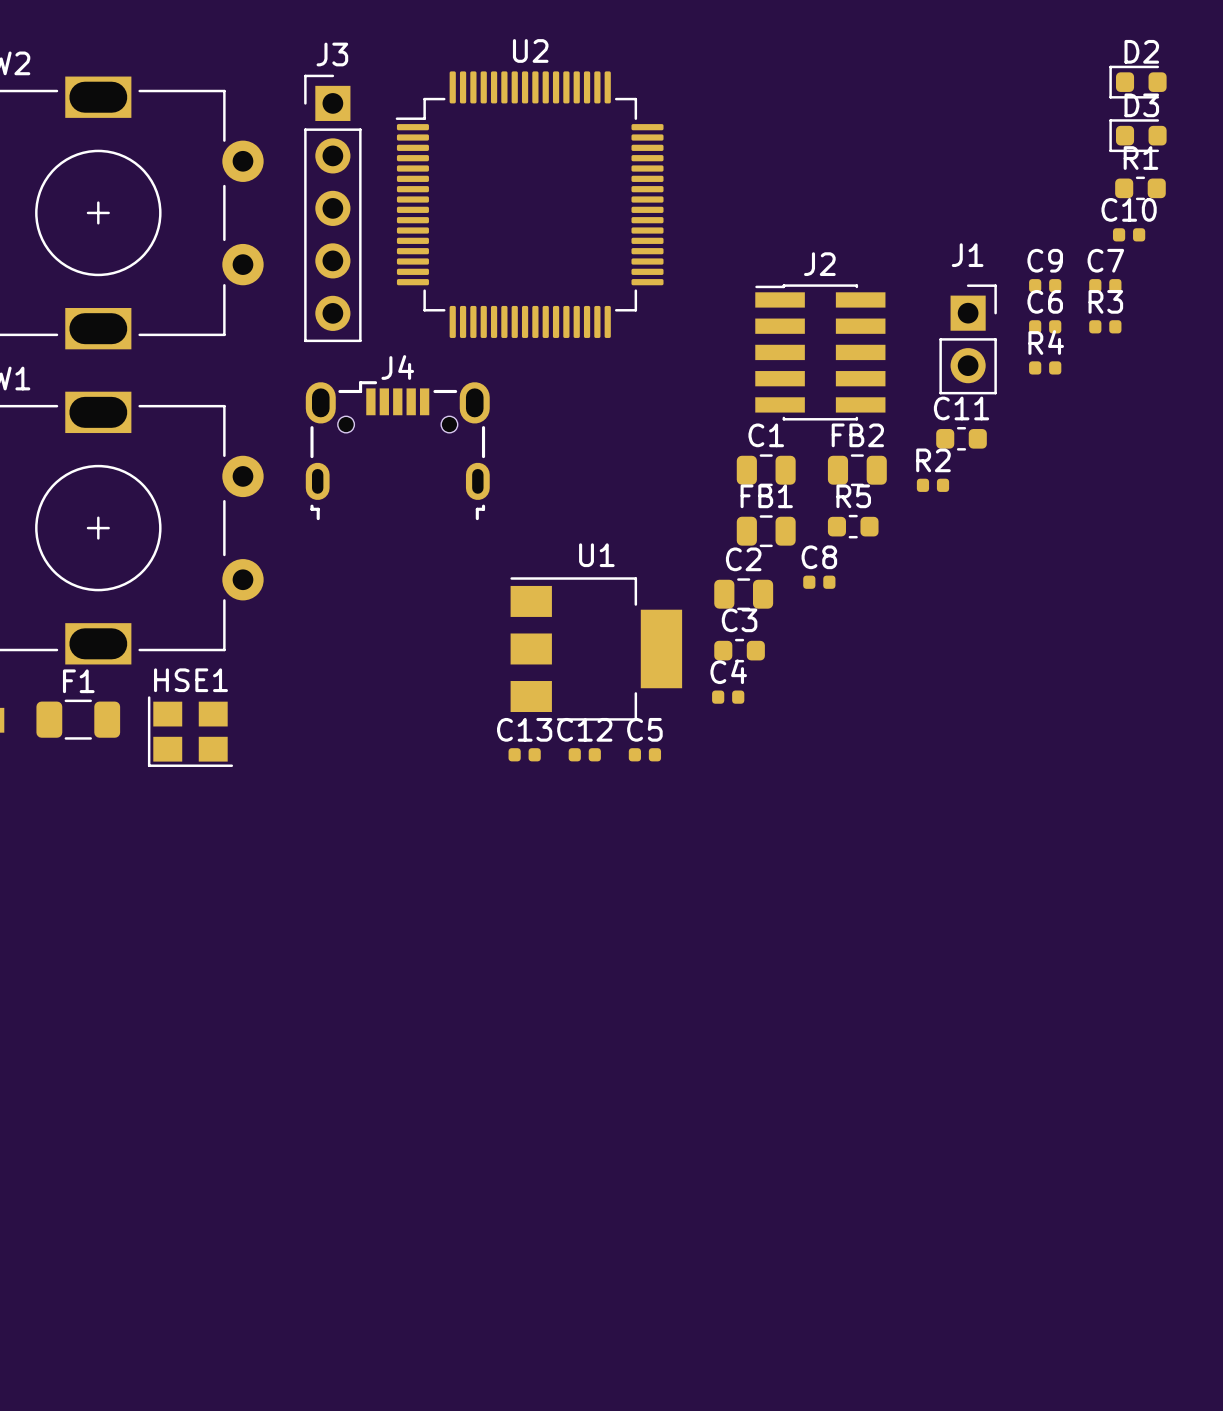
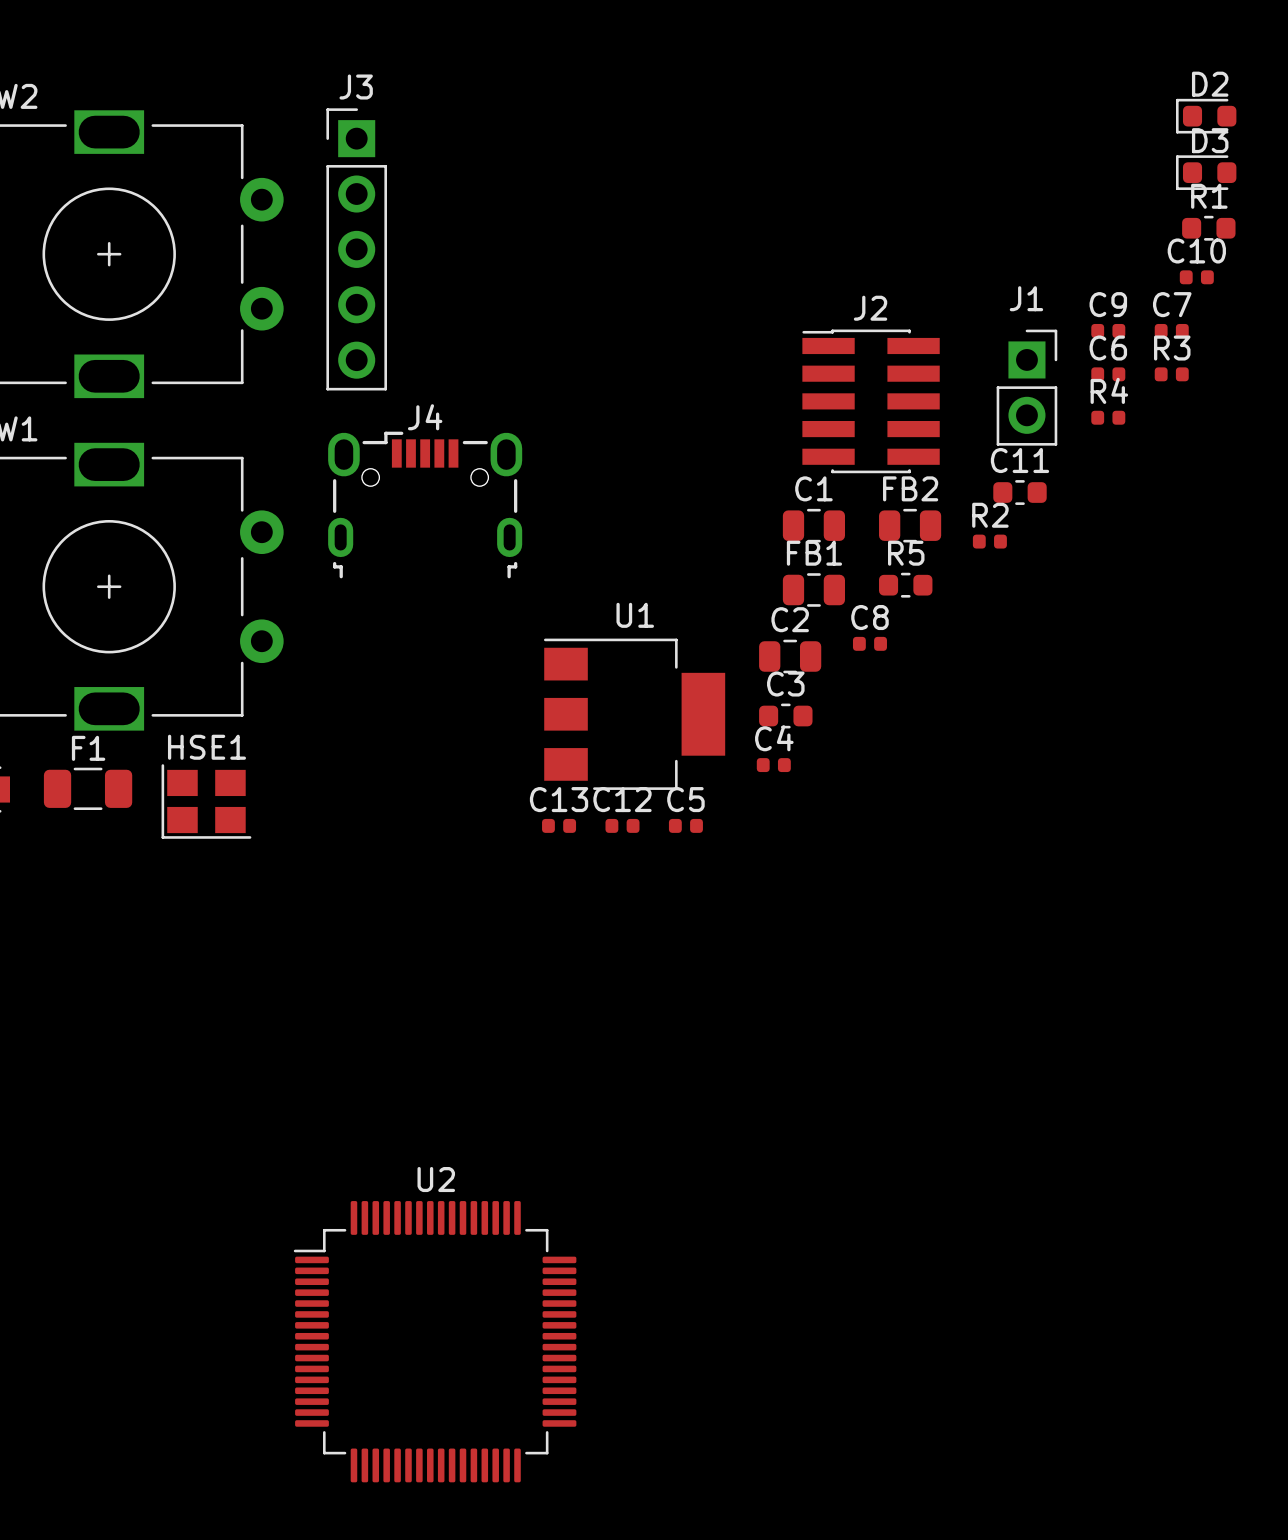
U2 position: (529, 204) -> (435, 1341)

